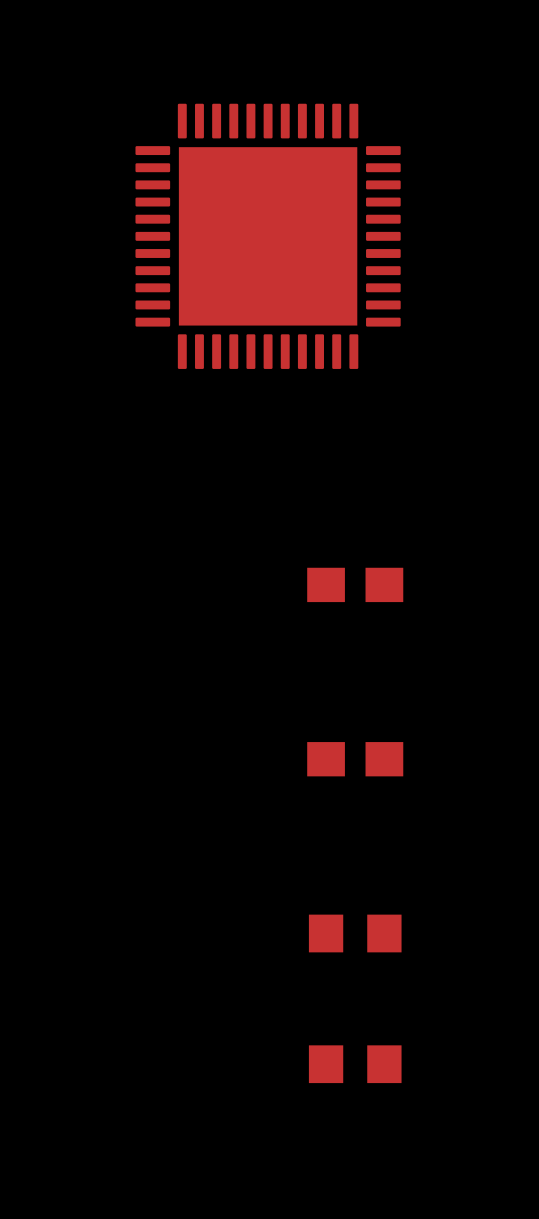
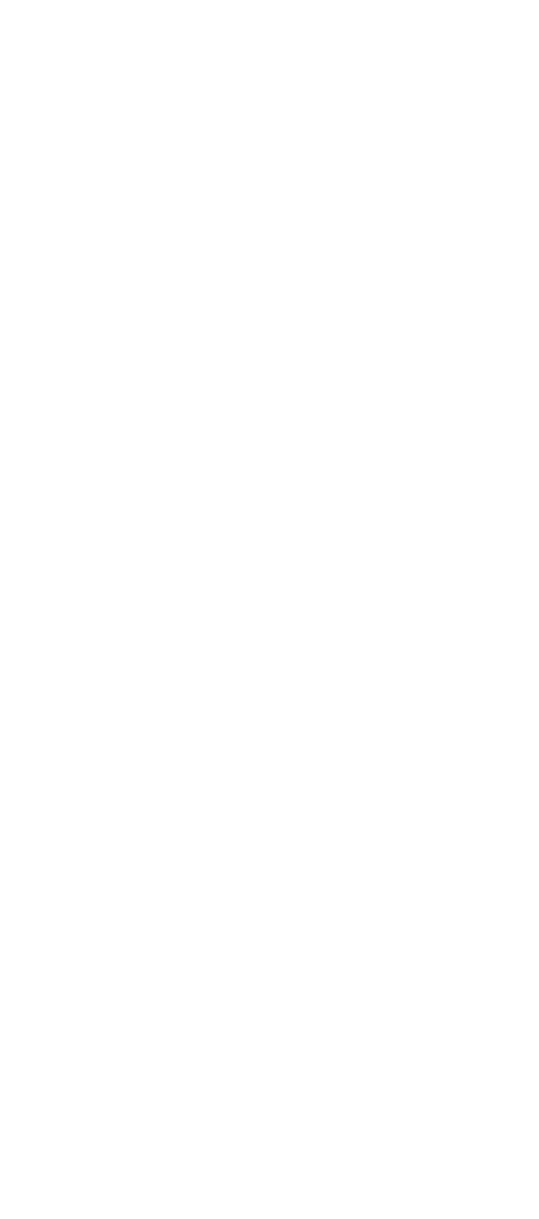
part: (268, 236) -> none
part: (355, 584) -> none
part: (355, 759) -> none
part: (355, 933) -> none
part: (355, 1064) -> none

